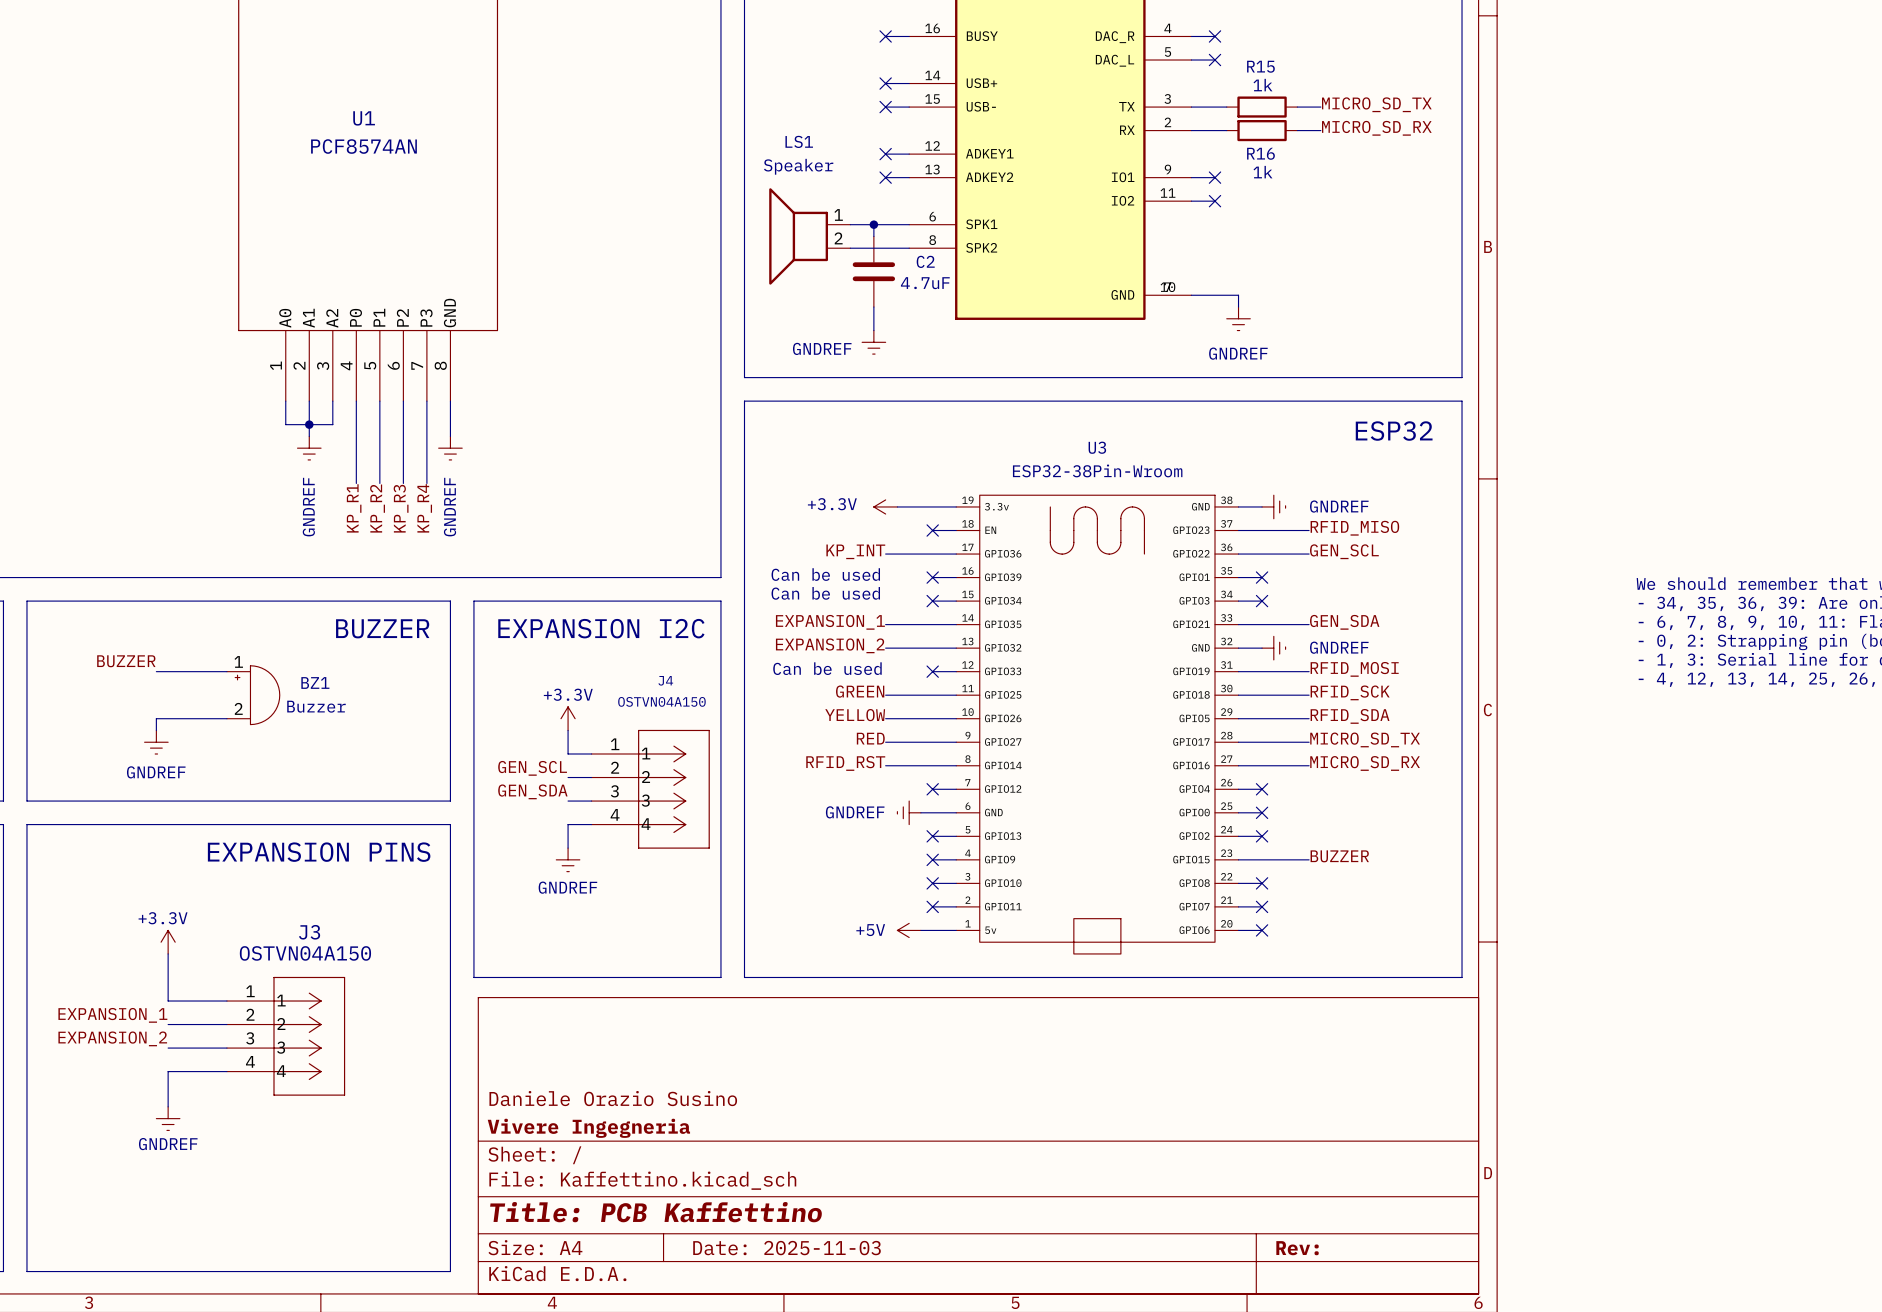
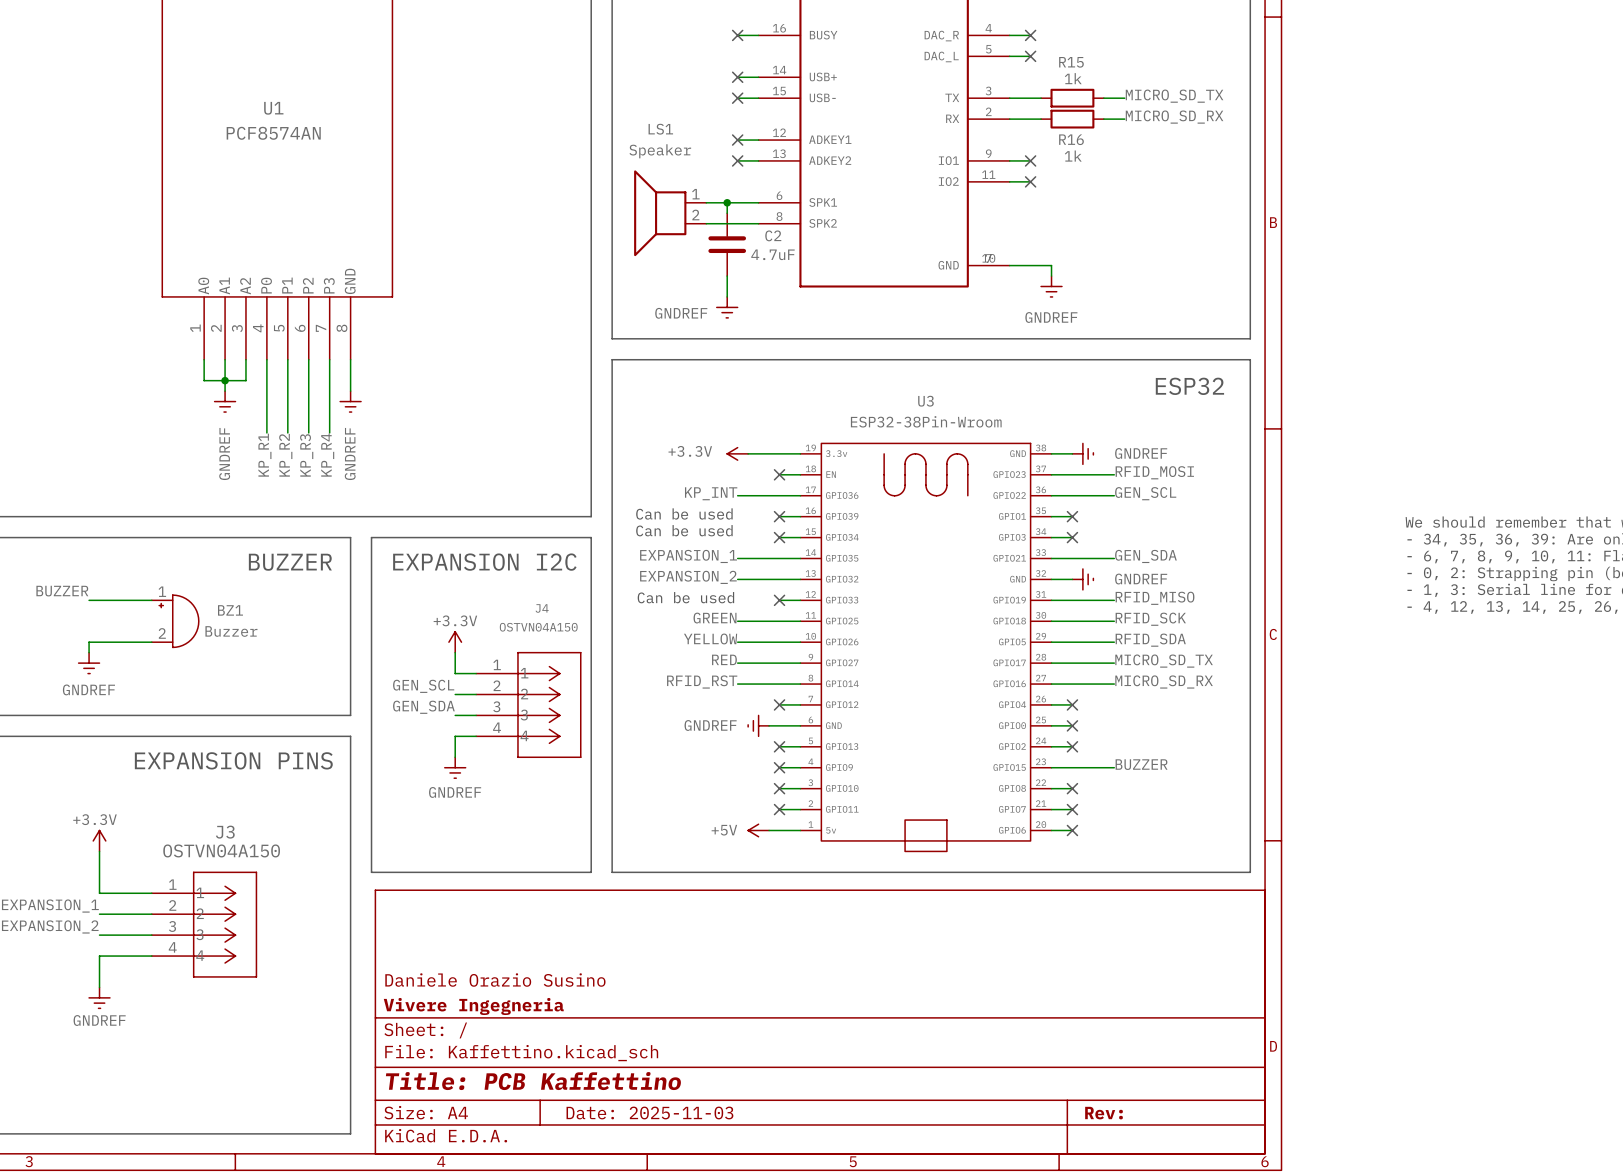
label: RFID_MISO (1354, 528) -> RFID_MOSI (1154, 472)
label: RFID_MOSI (1354, 669) -> RFID_MISO (1155, 598)

